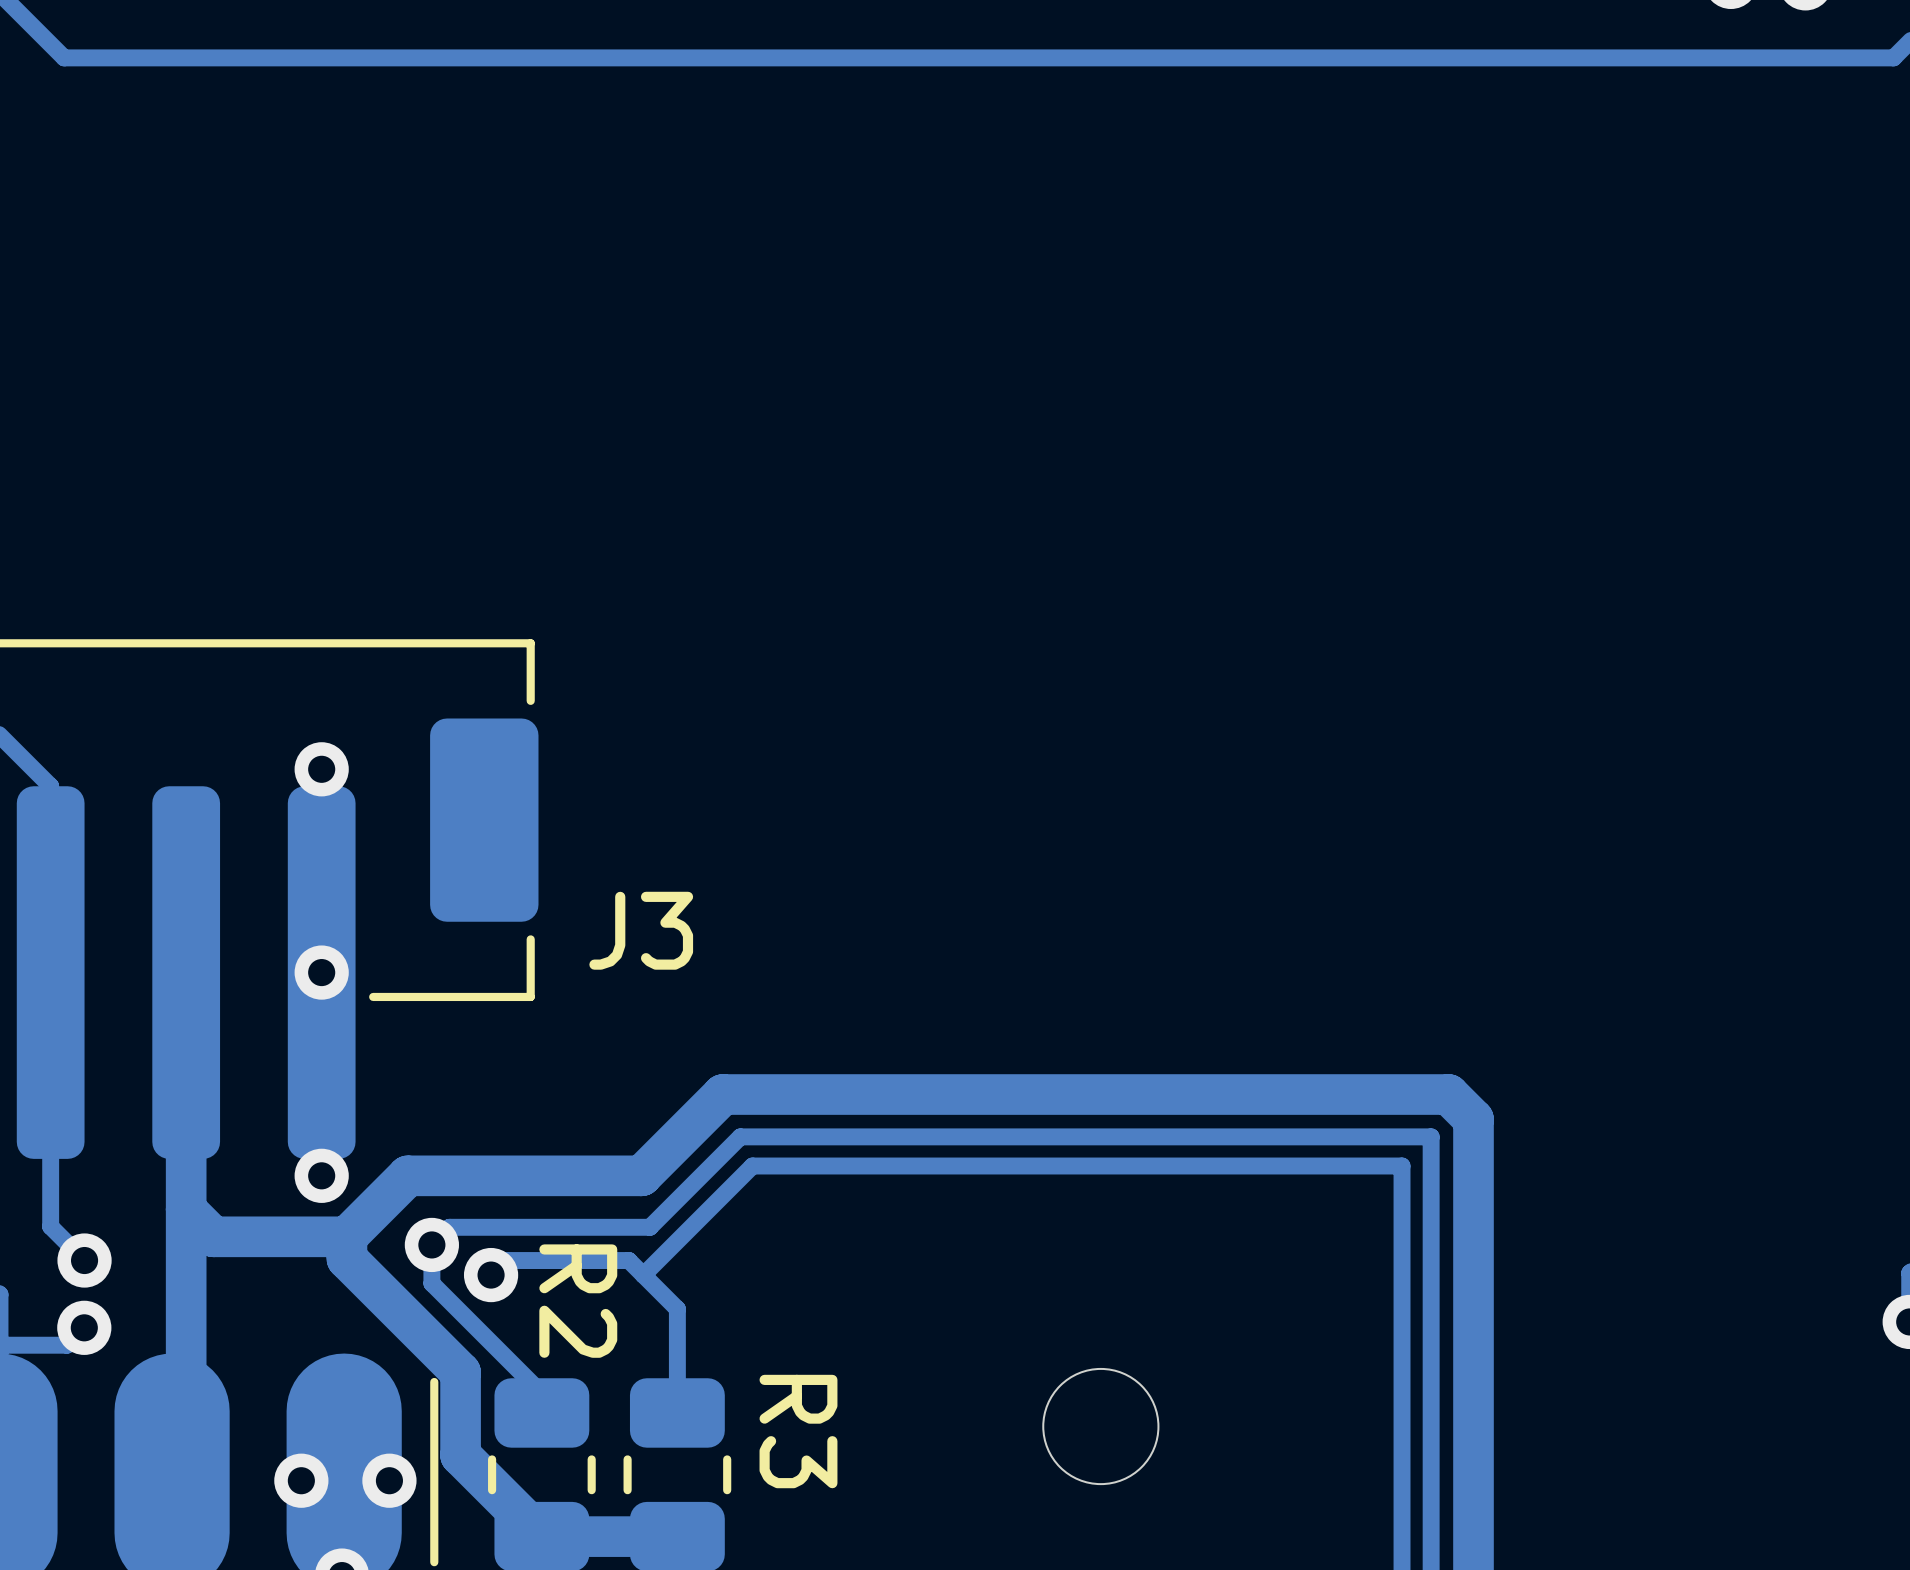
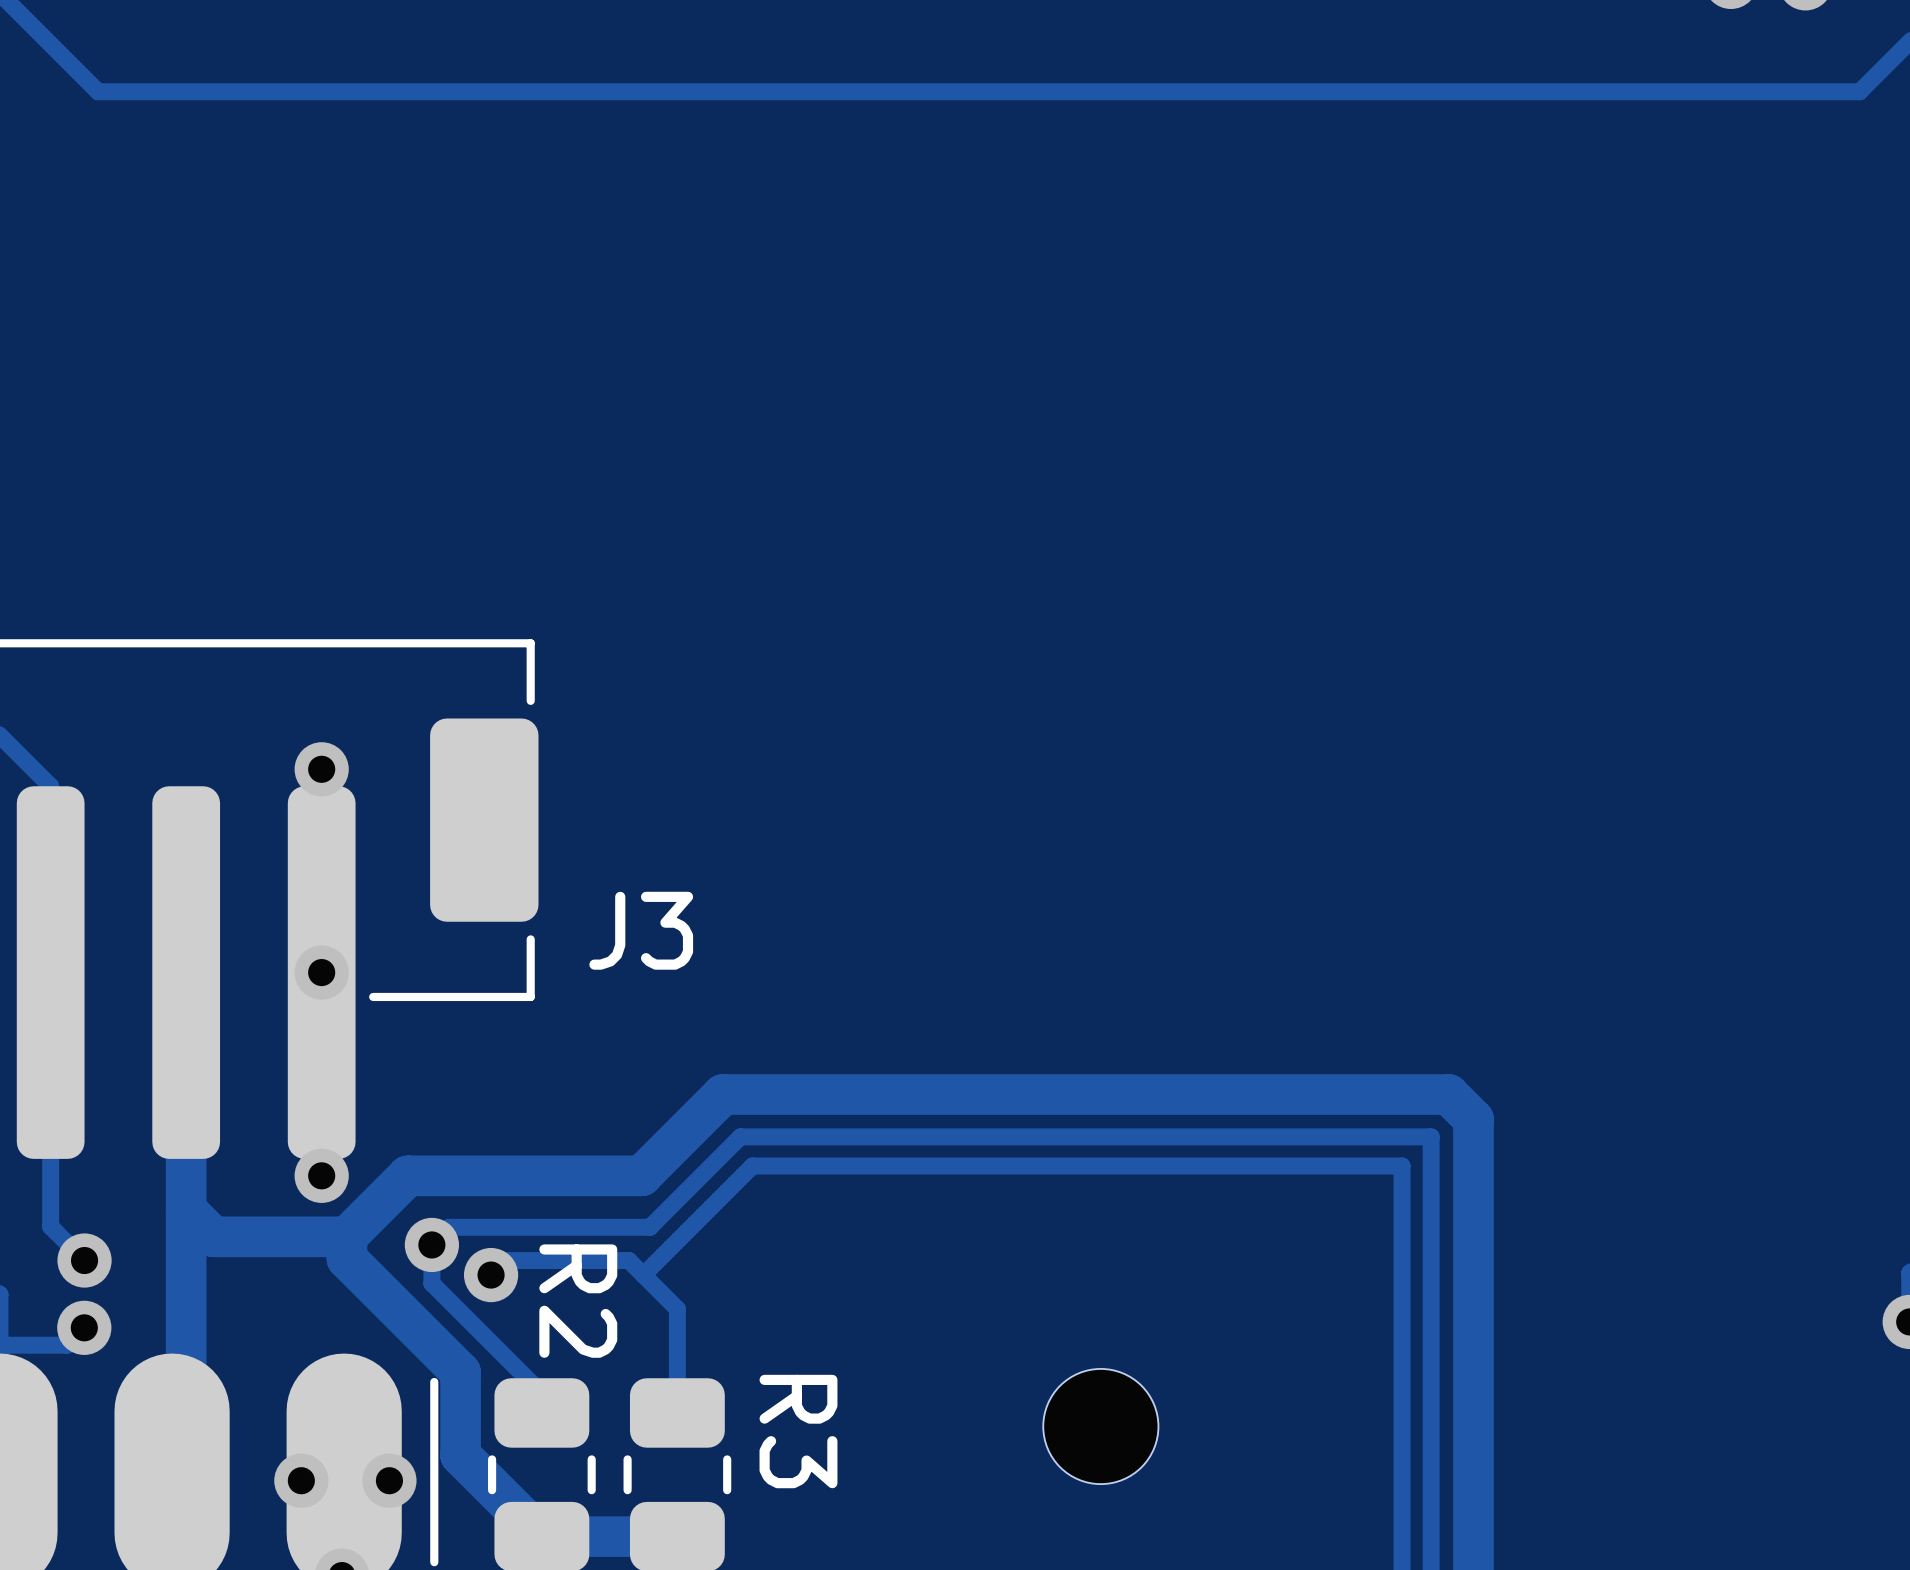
track: (1893, 57) (64, 57) -> (1893, 57) (1859, 91) (98, 91) (64, 57)

